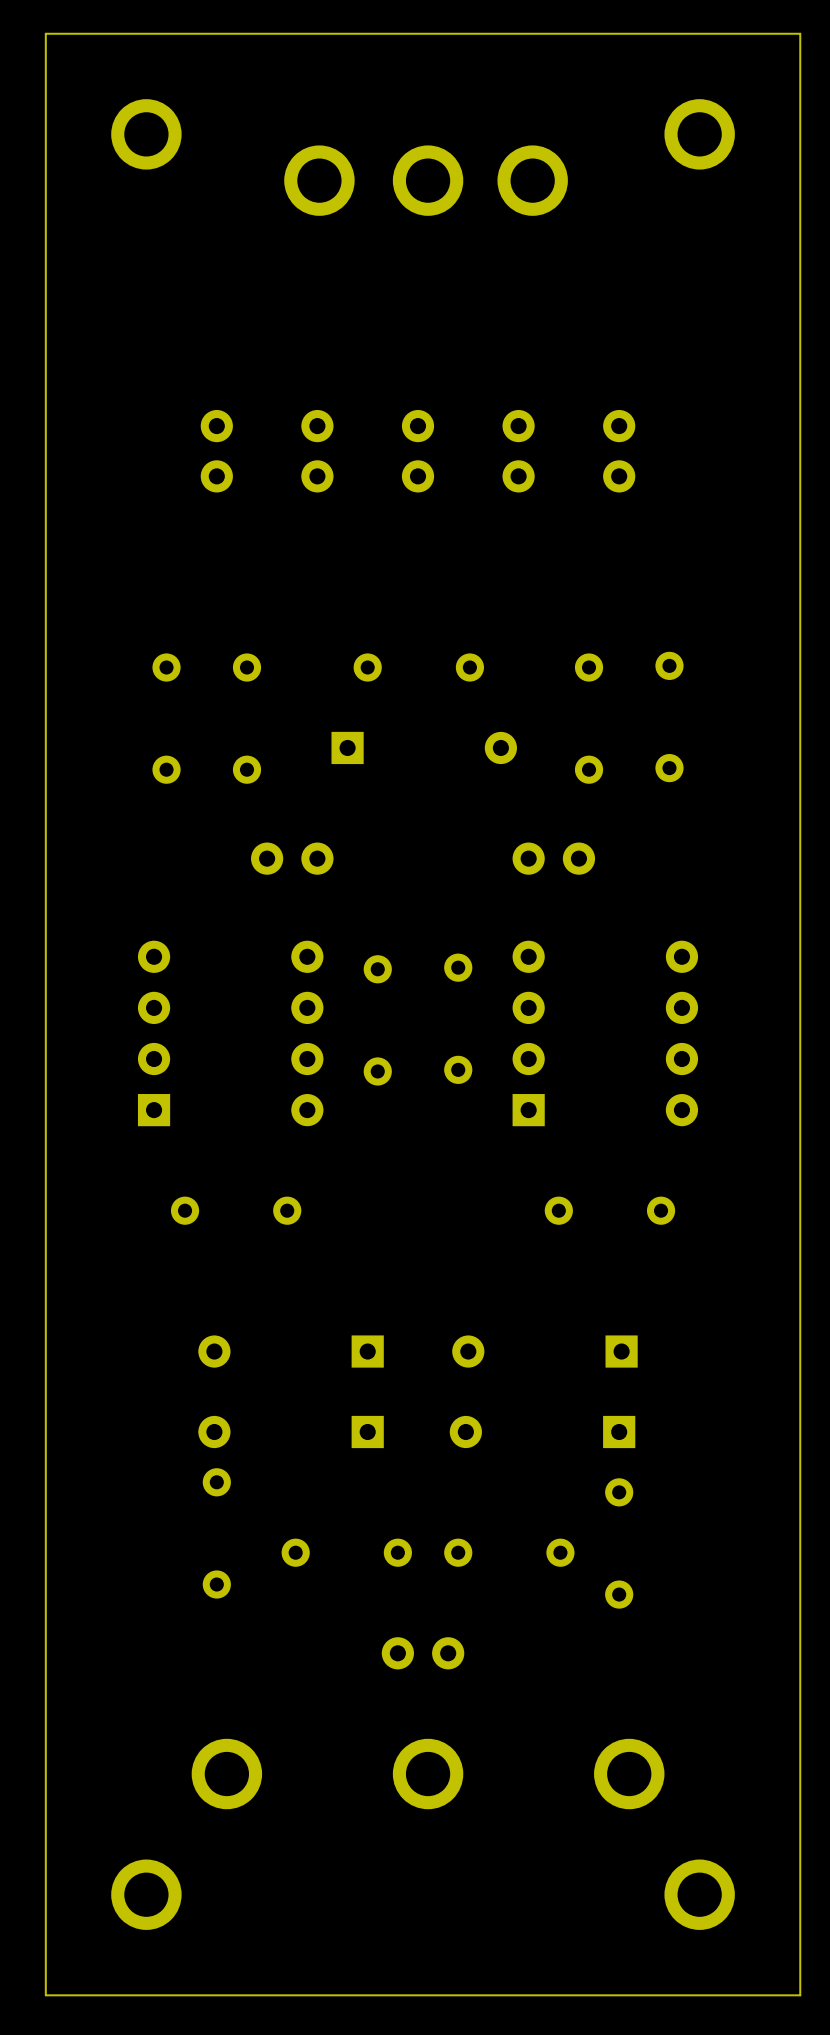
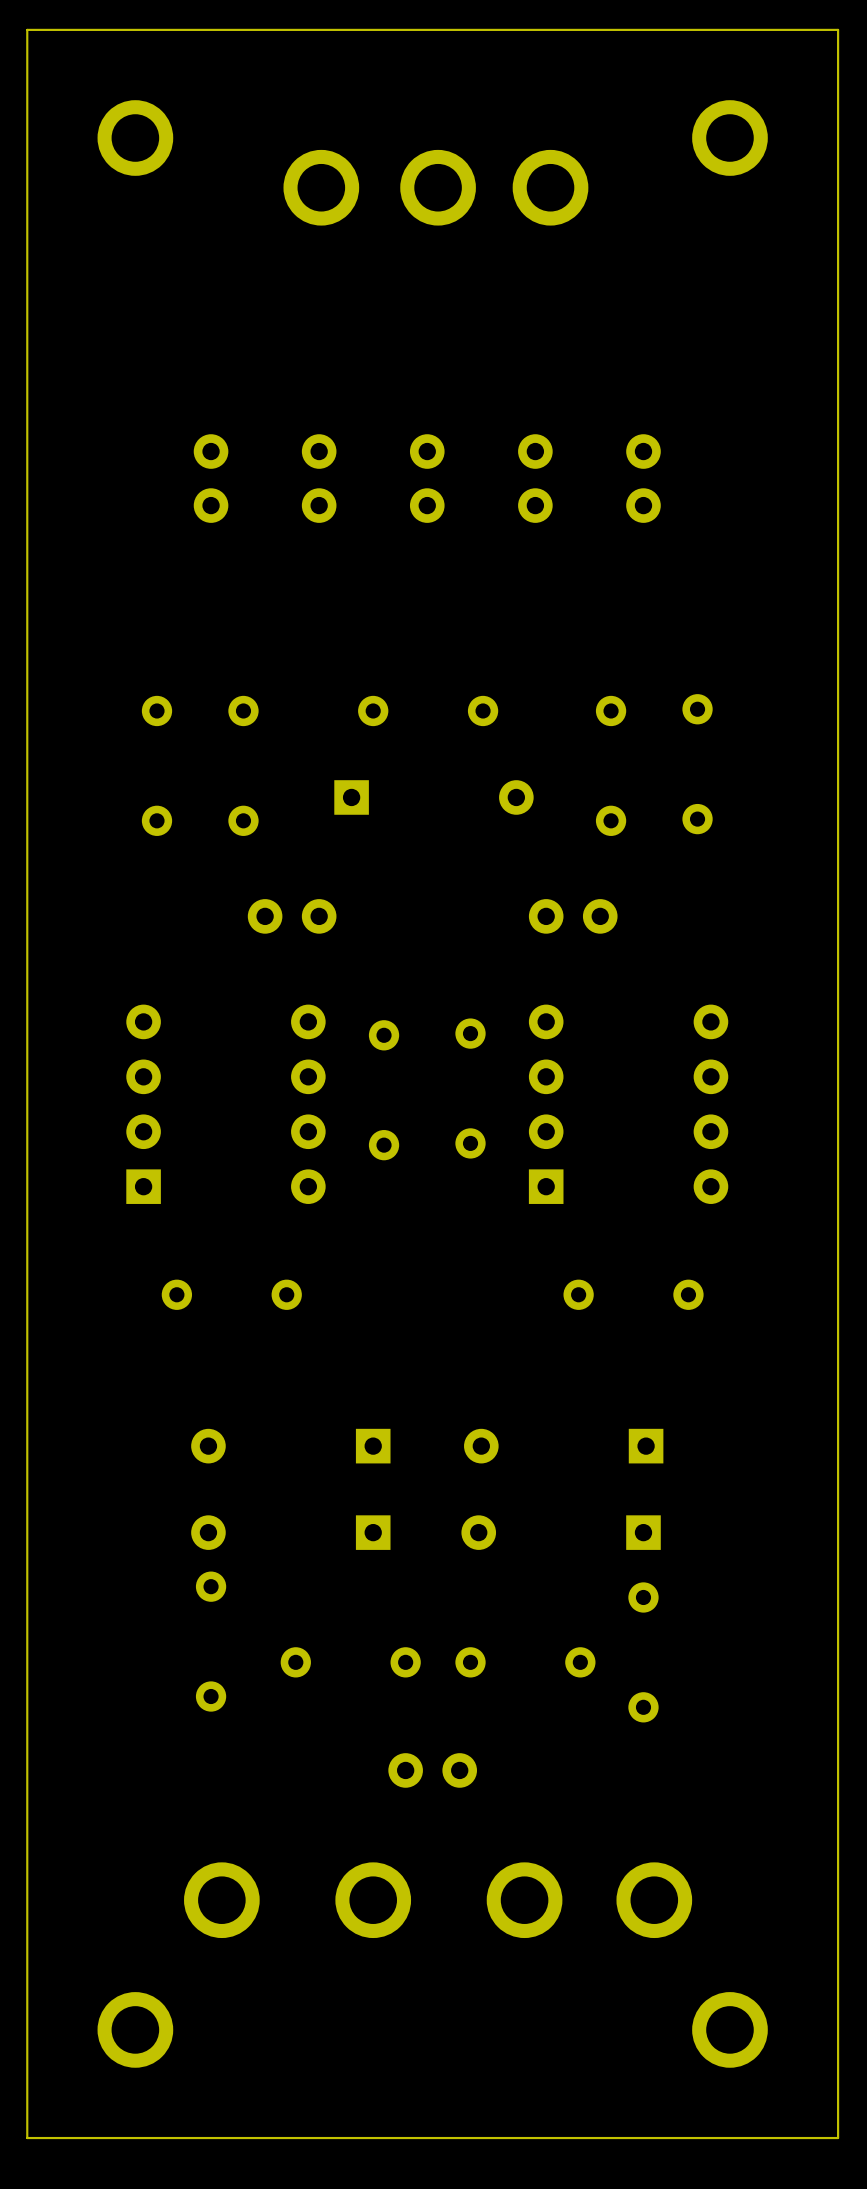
part: none -> (373, 1900)
part: (428, 1774) -> none
part: none -> (524, 1900)

